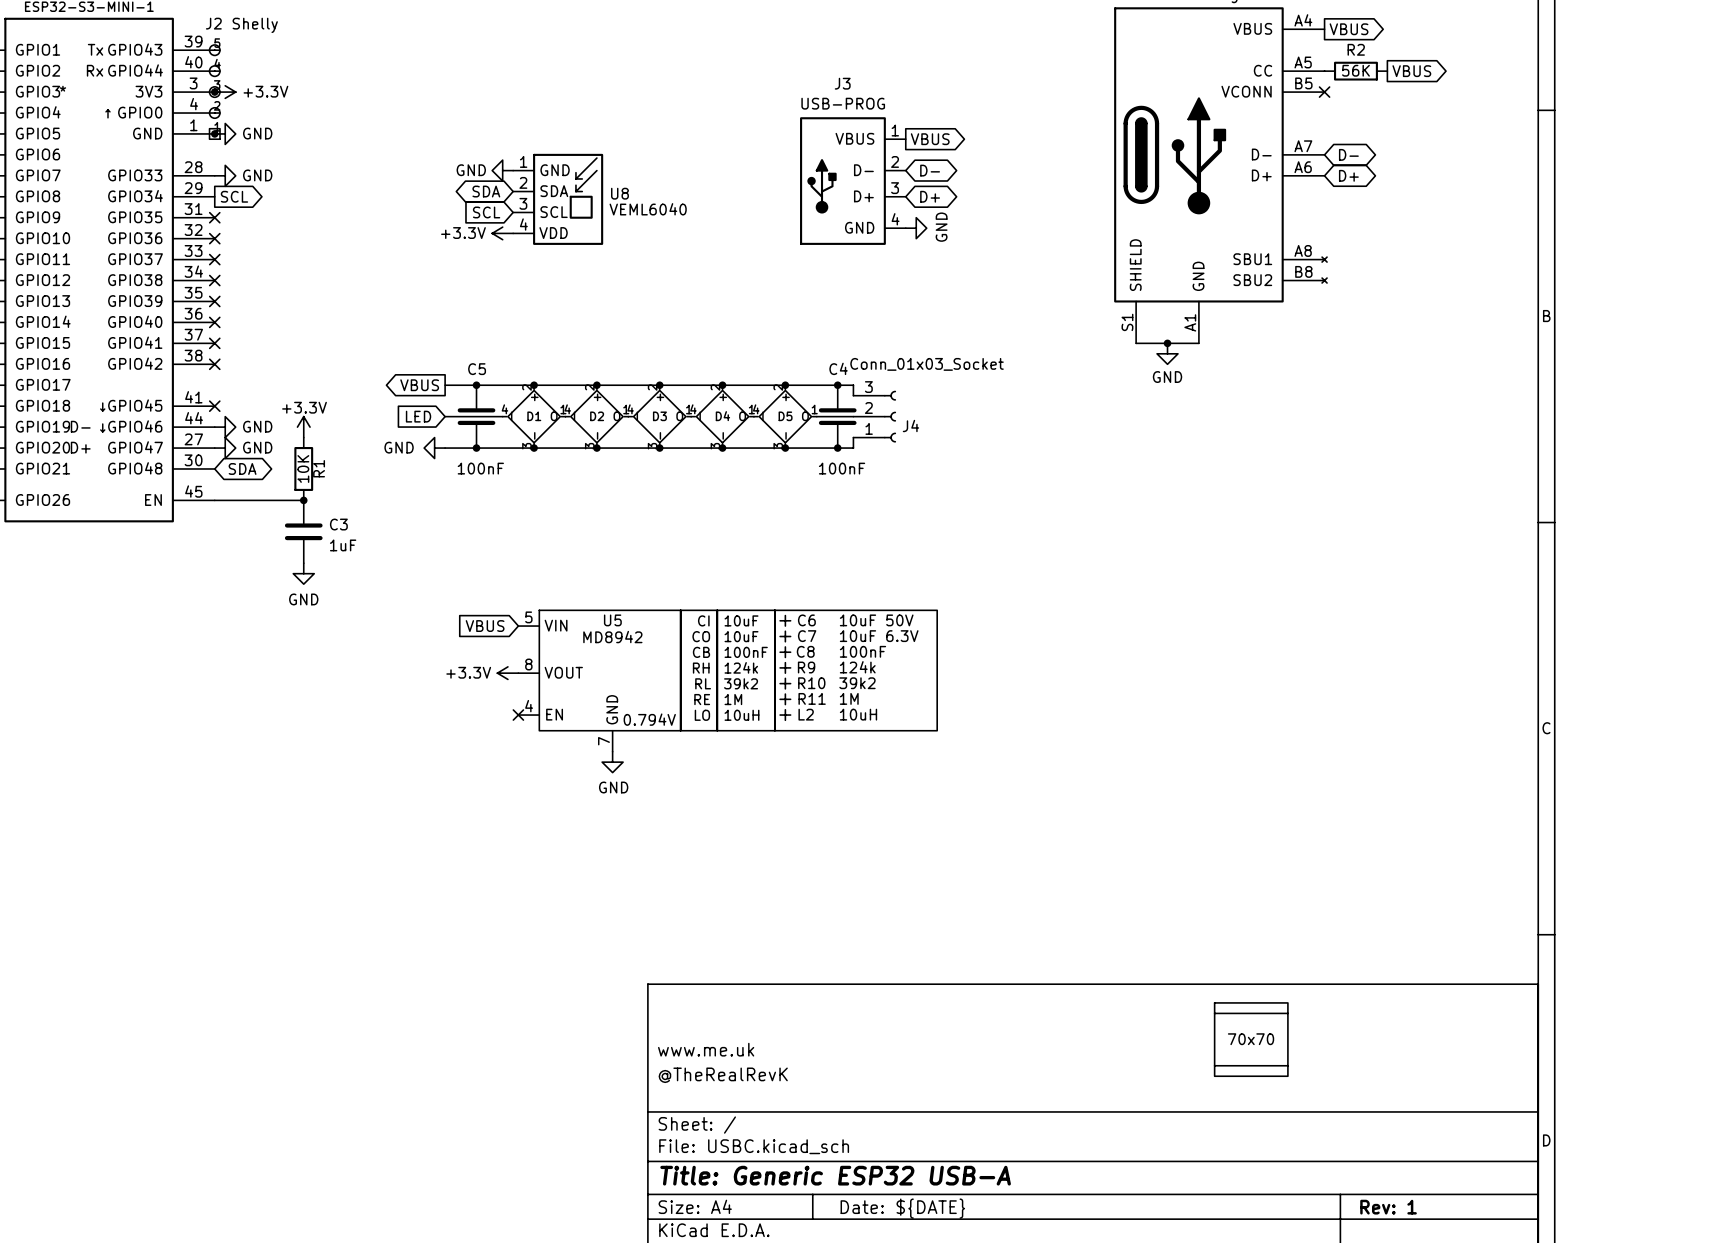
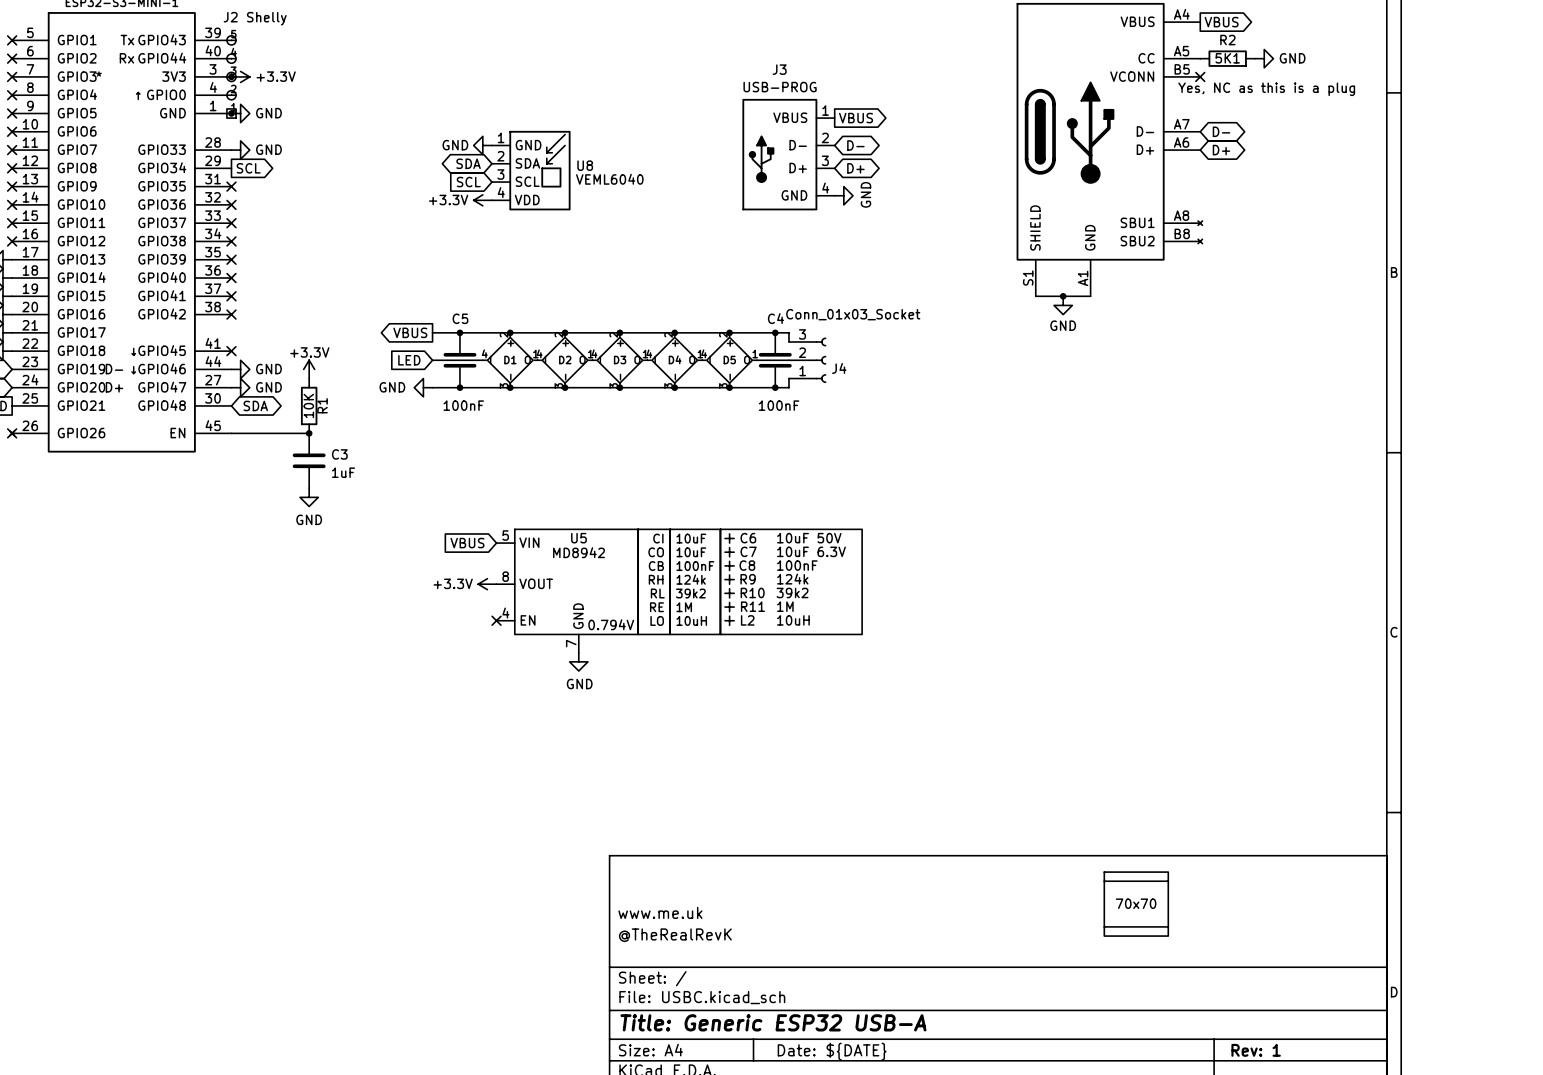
R2 value: 56K (1355, 70) -> 5K1 (1227, 58)
power symbol: none -> GND (1264, 58)
global label: VBUS (1411, 71) -> none
text: none -> Yes, NC as this is a plug (1266, 89)

